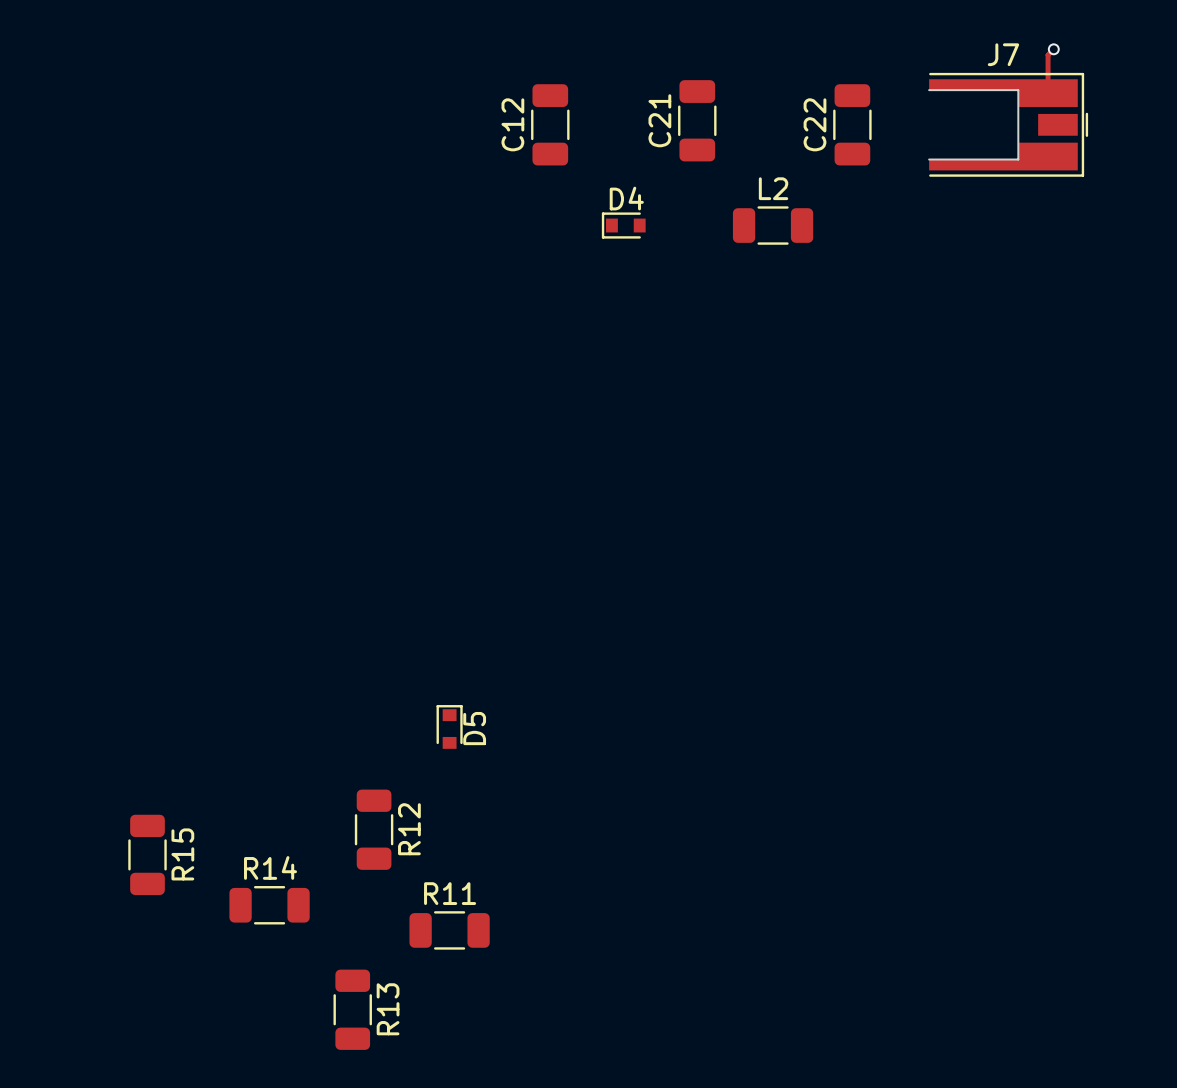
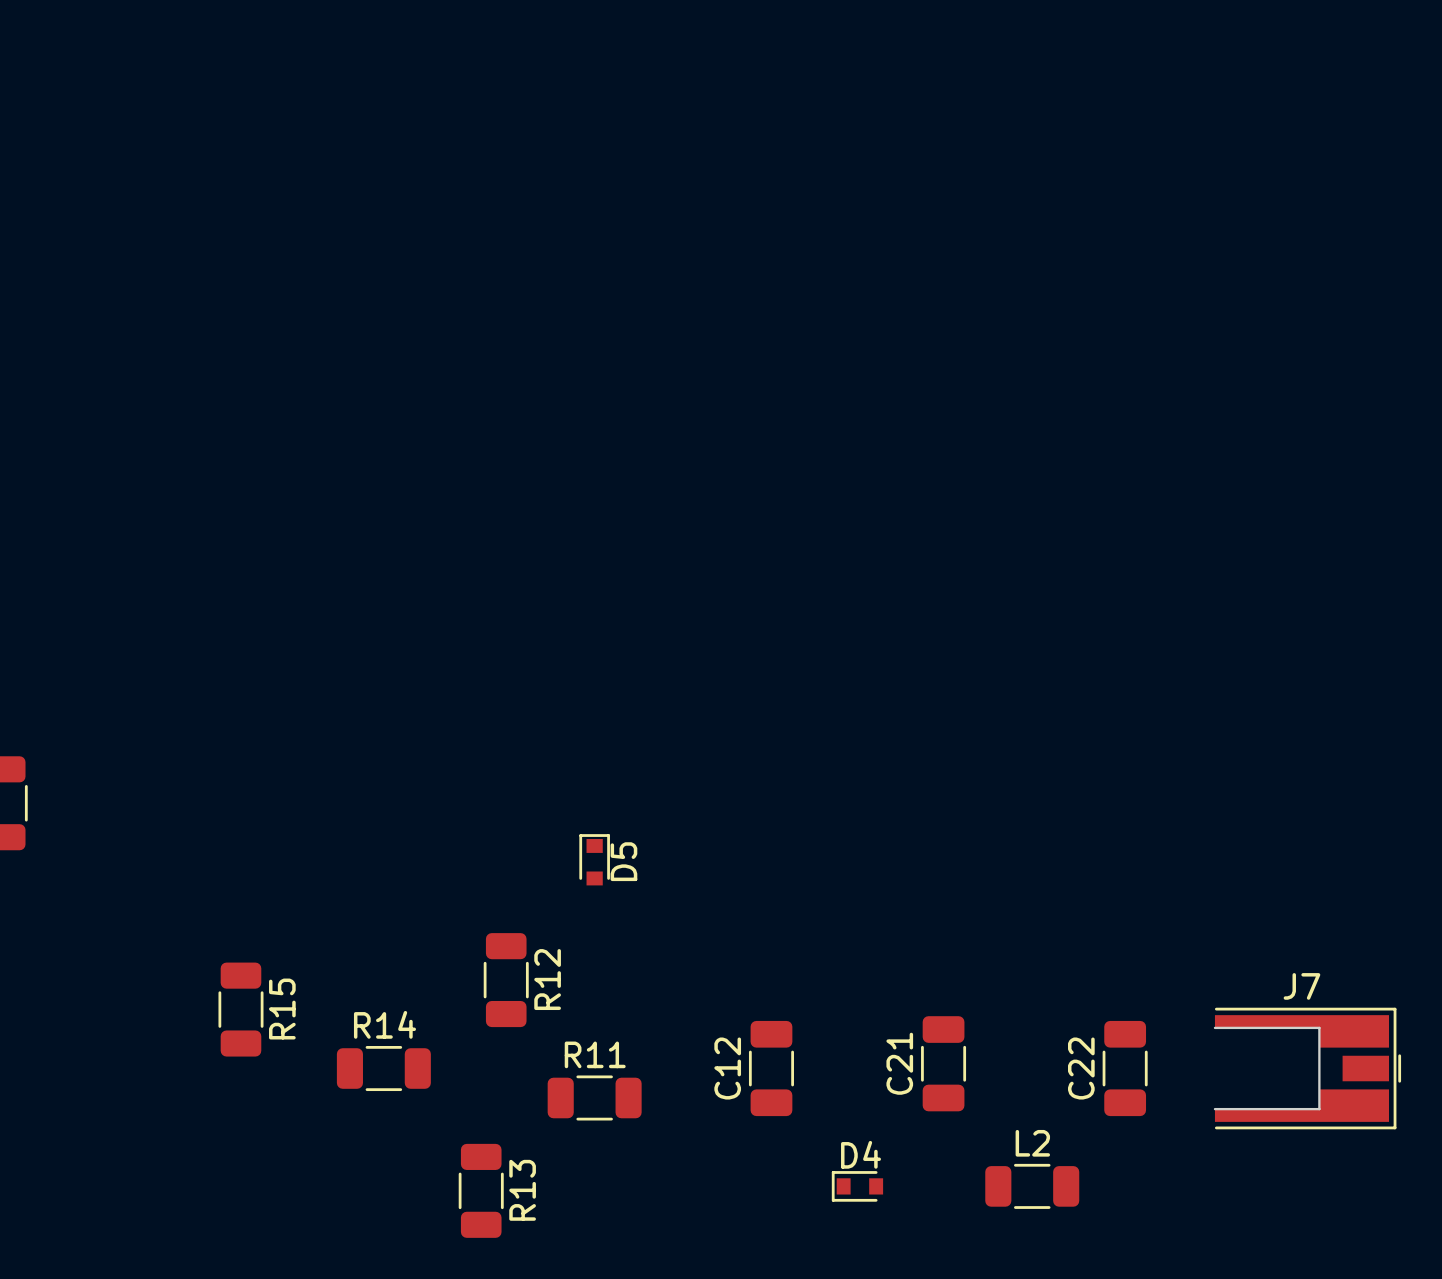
track: (1053, 49) (1048, 55) (1048, 93) -> none
via: (1053, 49) -> none
C21 position: (697, 120) -> (943, 1063)
C12 position: (550, 124) -> (771, 1068)
C22 position: (852, 124) -> (1125, 1068)
J7 position: (1008, 124) -> (1307, 1068)
D4 position: (623, 225) -> (857, 1186)
L2 position: (773, 225) -> (1032, 1186)

